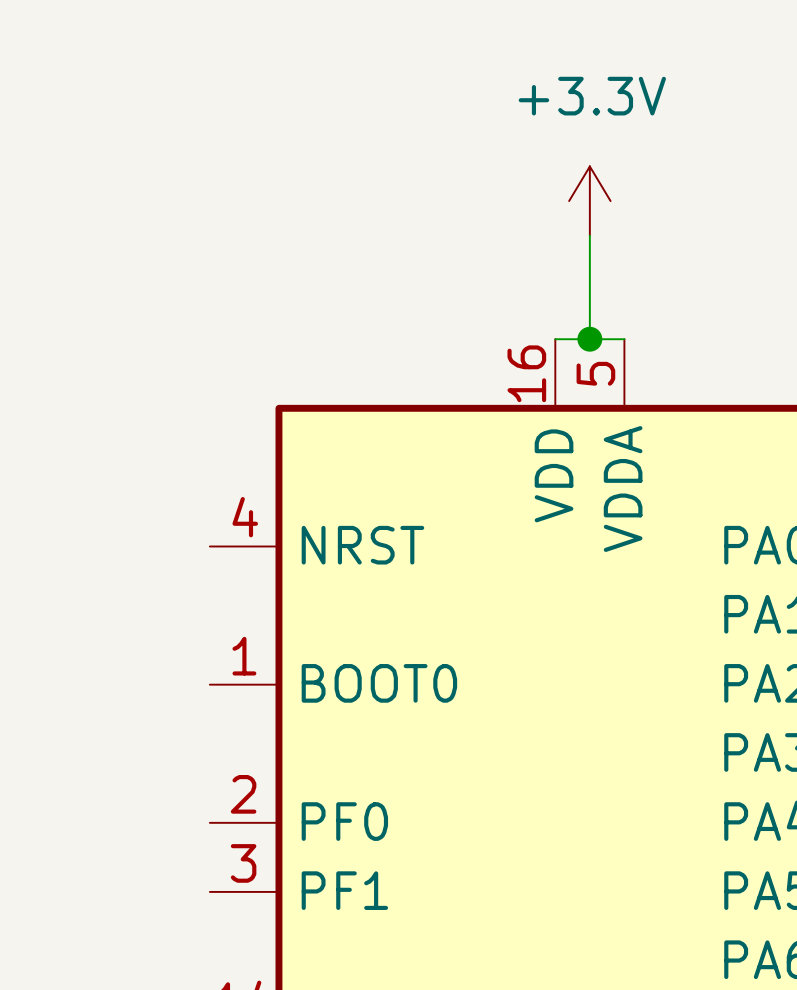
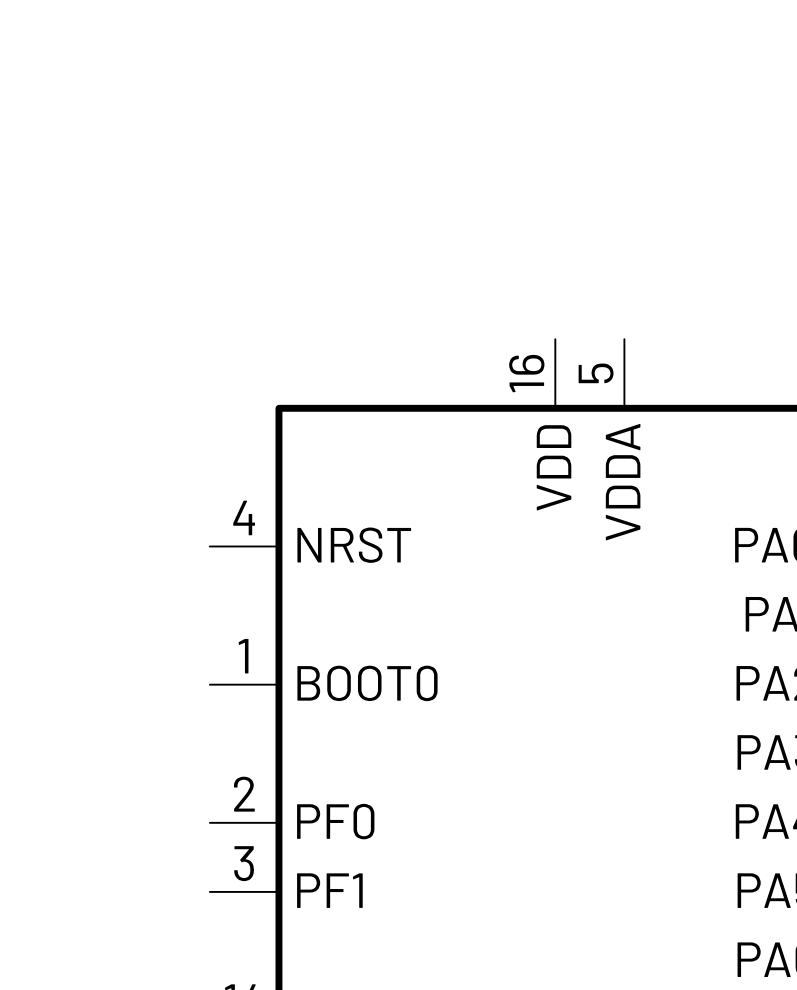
power symbol: +3.3V (589, 201) -> none
wire: (589, 235) (589, 339) -> none
wire: (555, 339) (624, 339) -> none
junction: (589, 339) -> none

